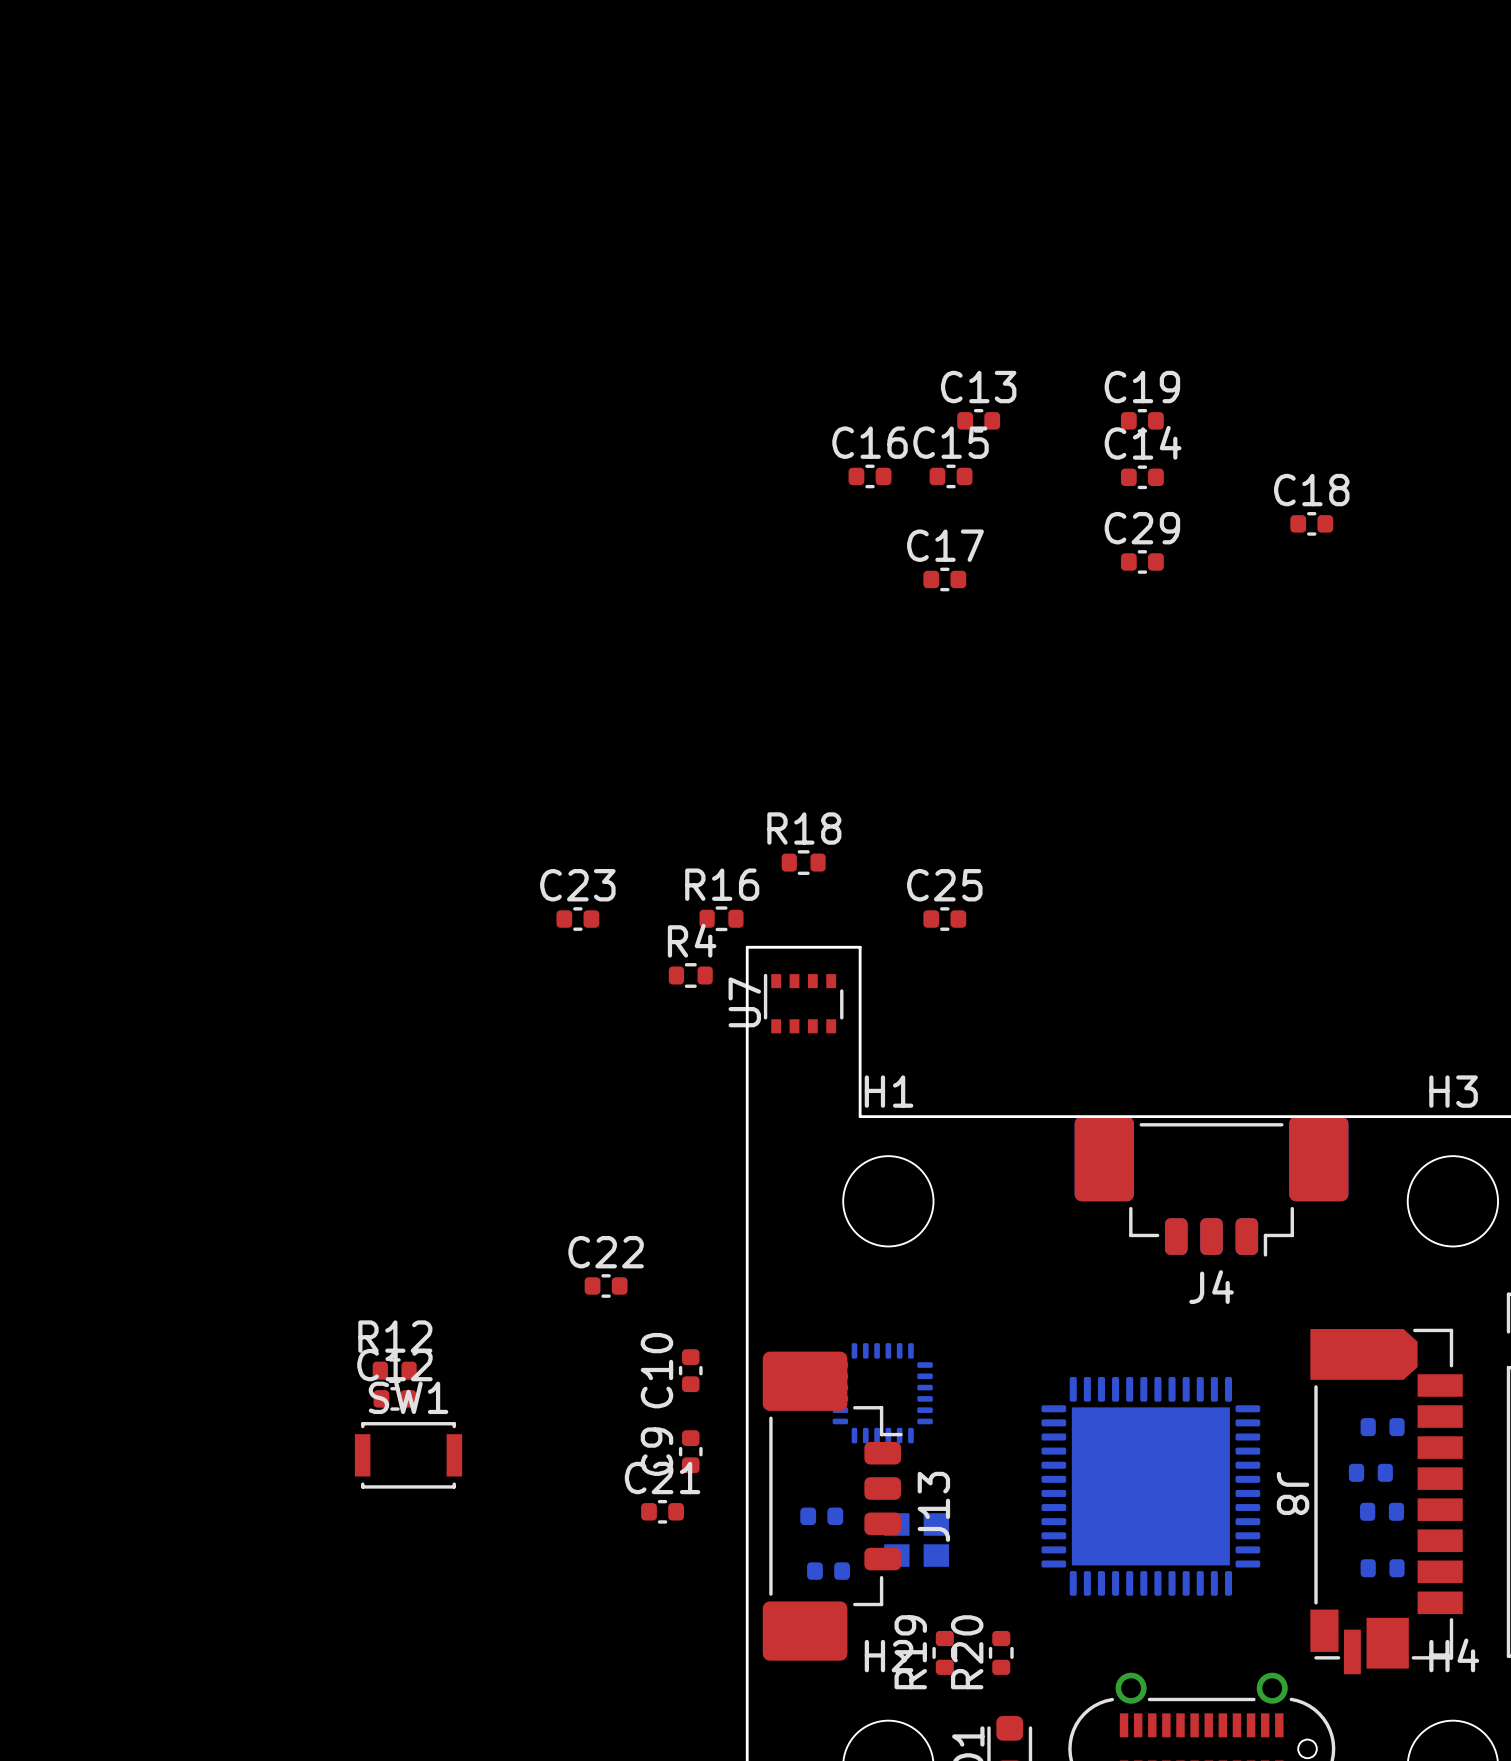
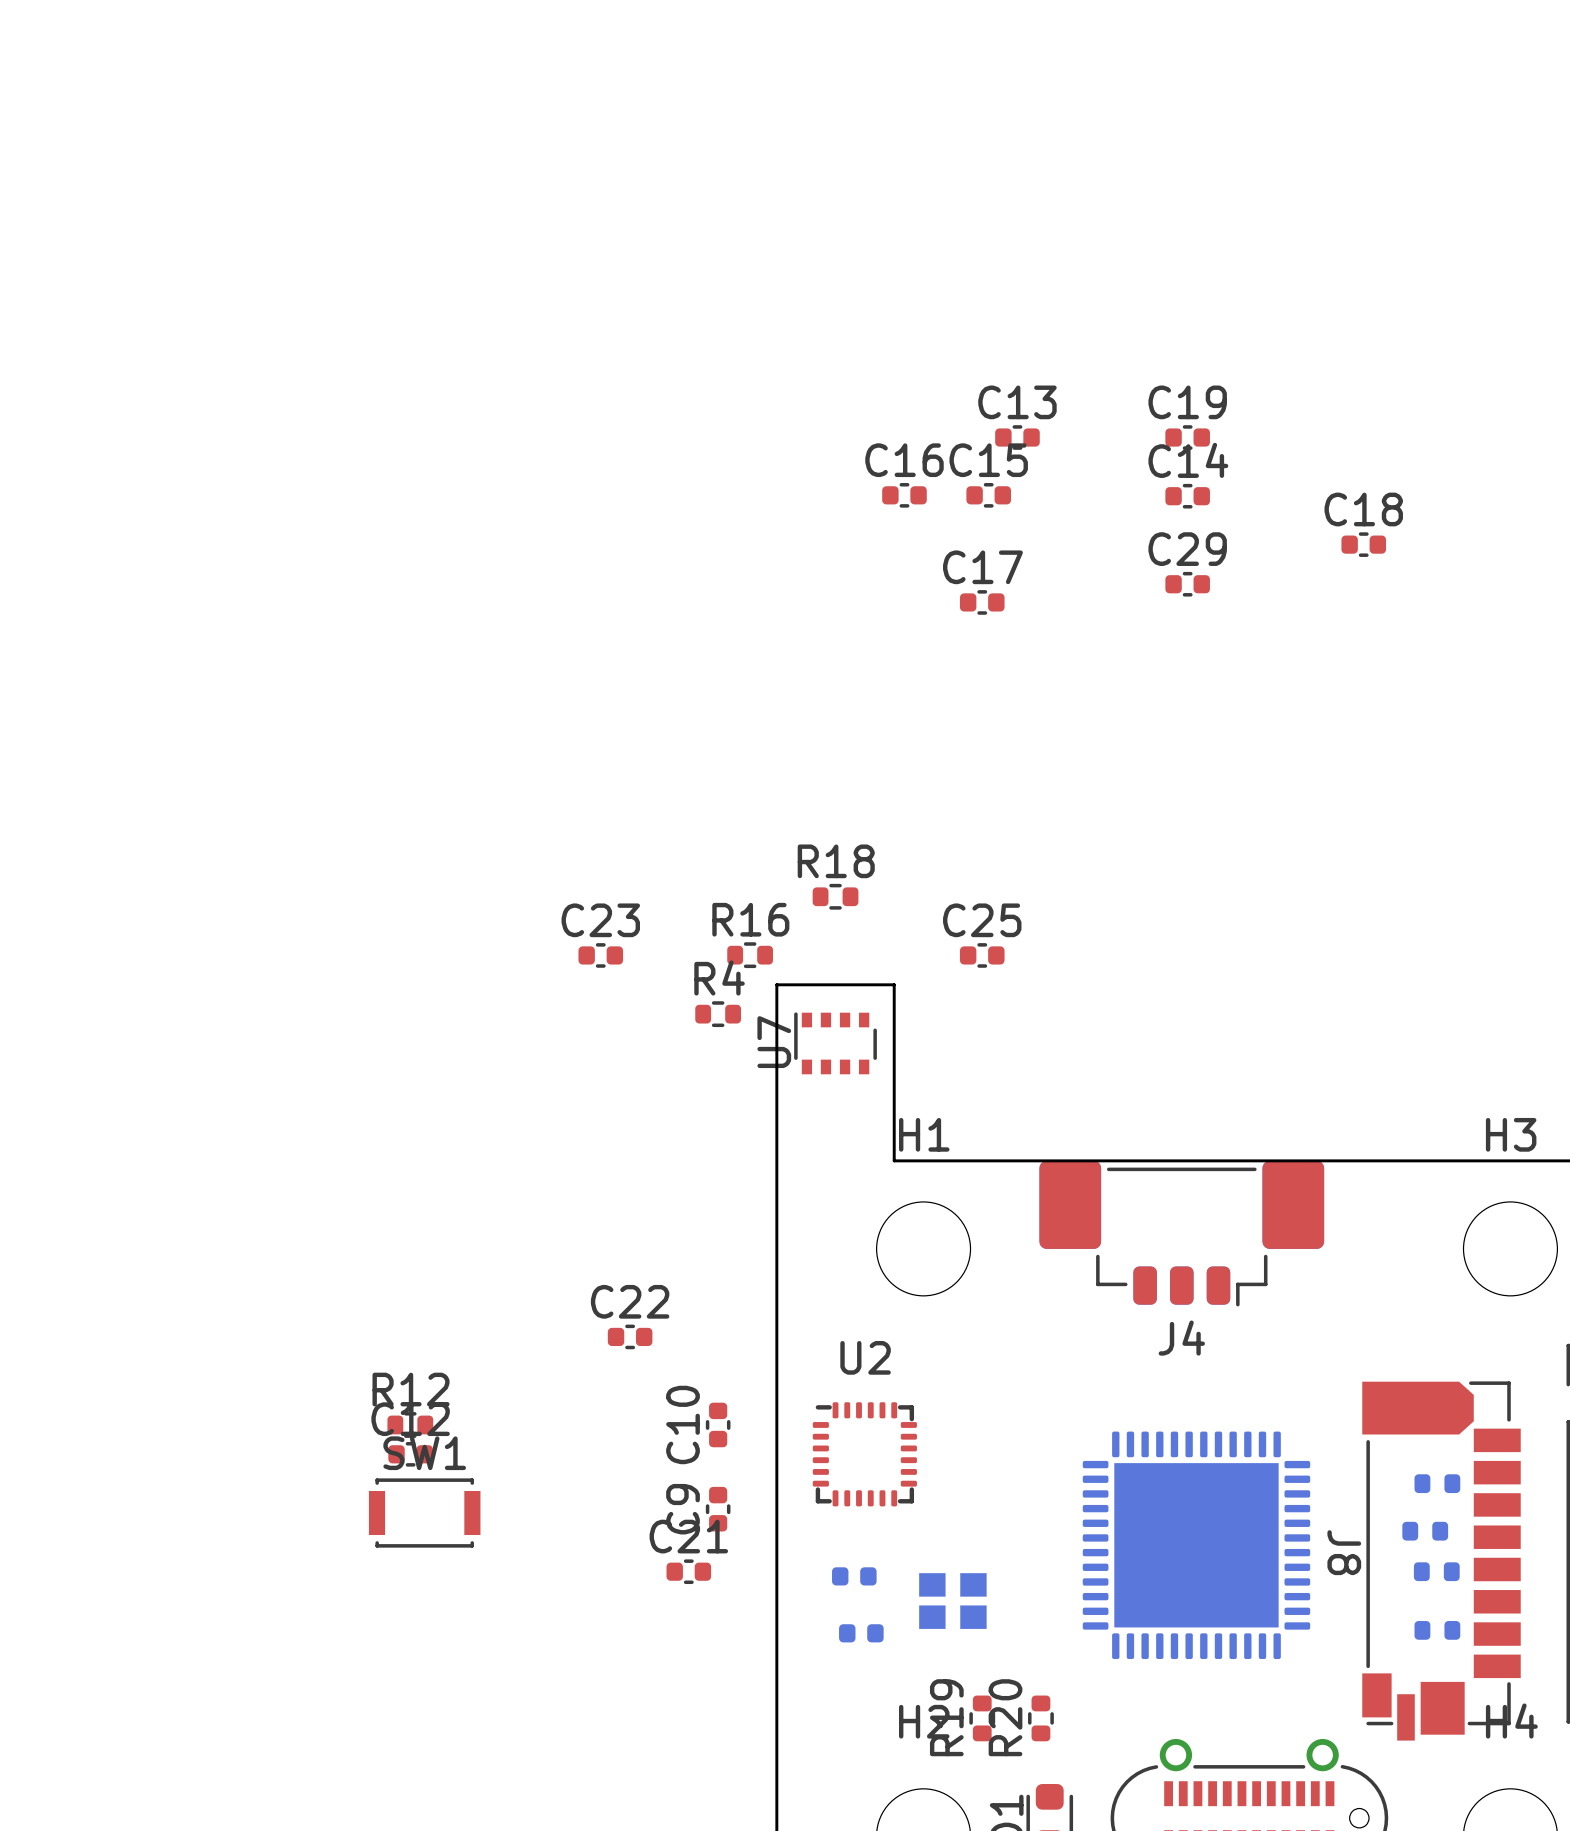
J4 position: (1211, 1186) -> (1181, 1233)
U2 side: bottom (882, 1393) -> top (864, 1454)
J13: (832, 1506) -> none

